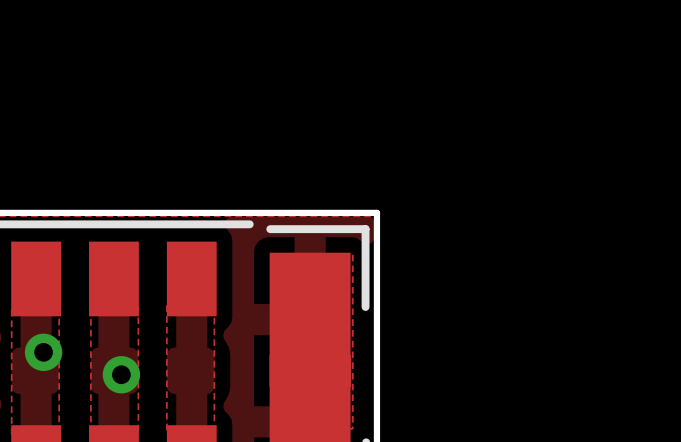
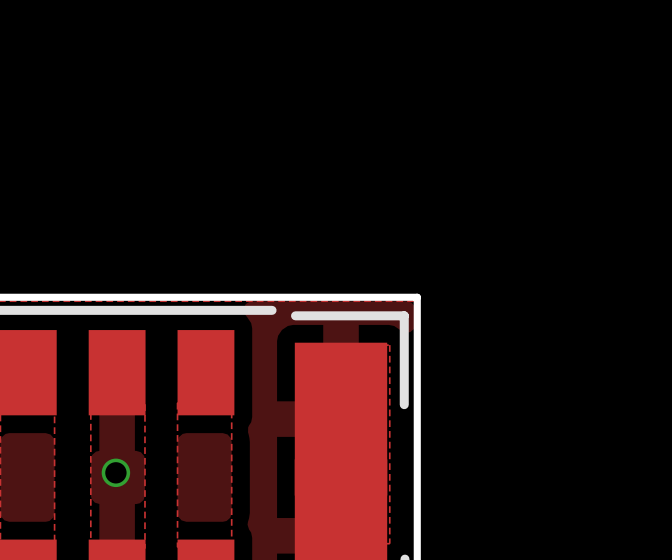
via: (43, 352) -> none
via size: [102, 356, 141, 394] -> [101, 458, 131, 488]

